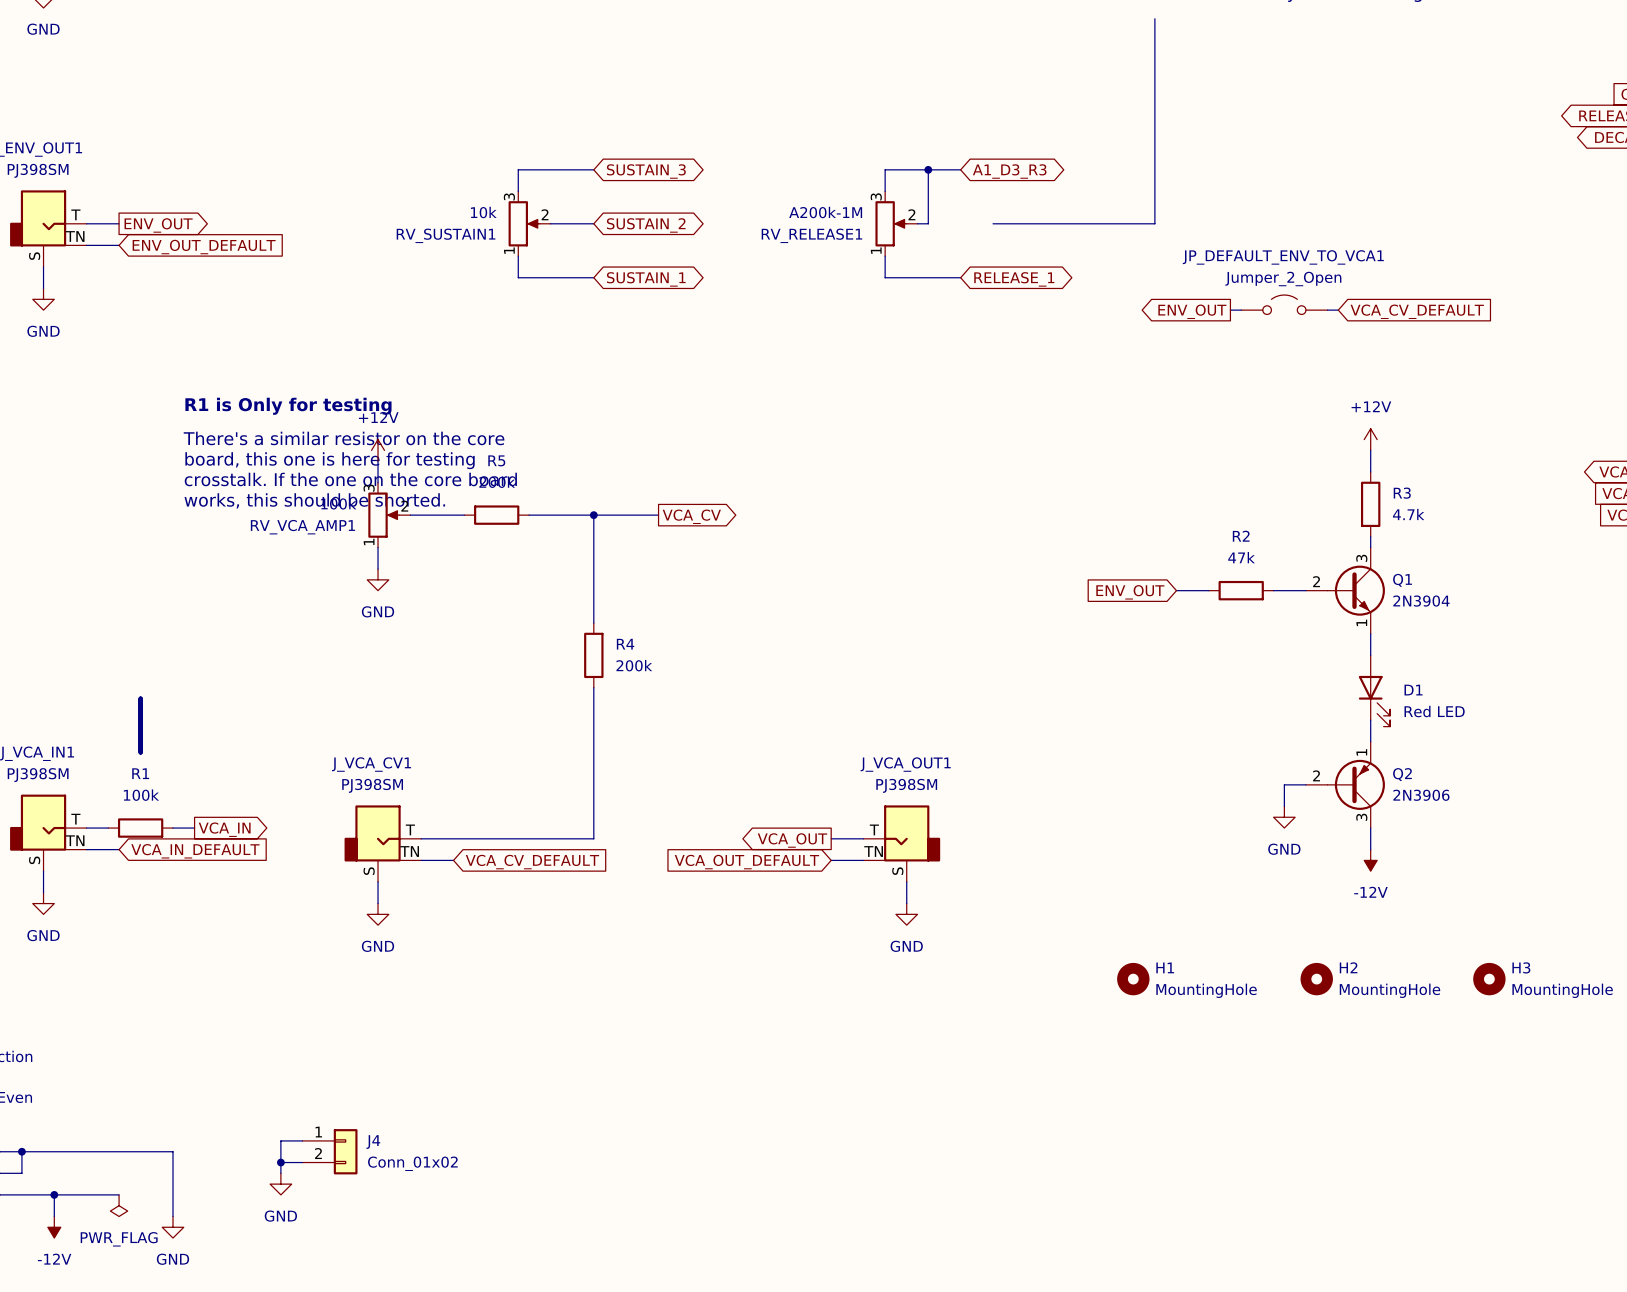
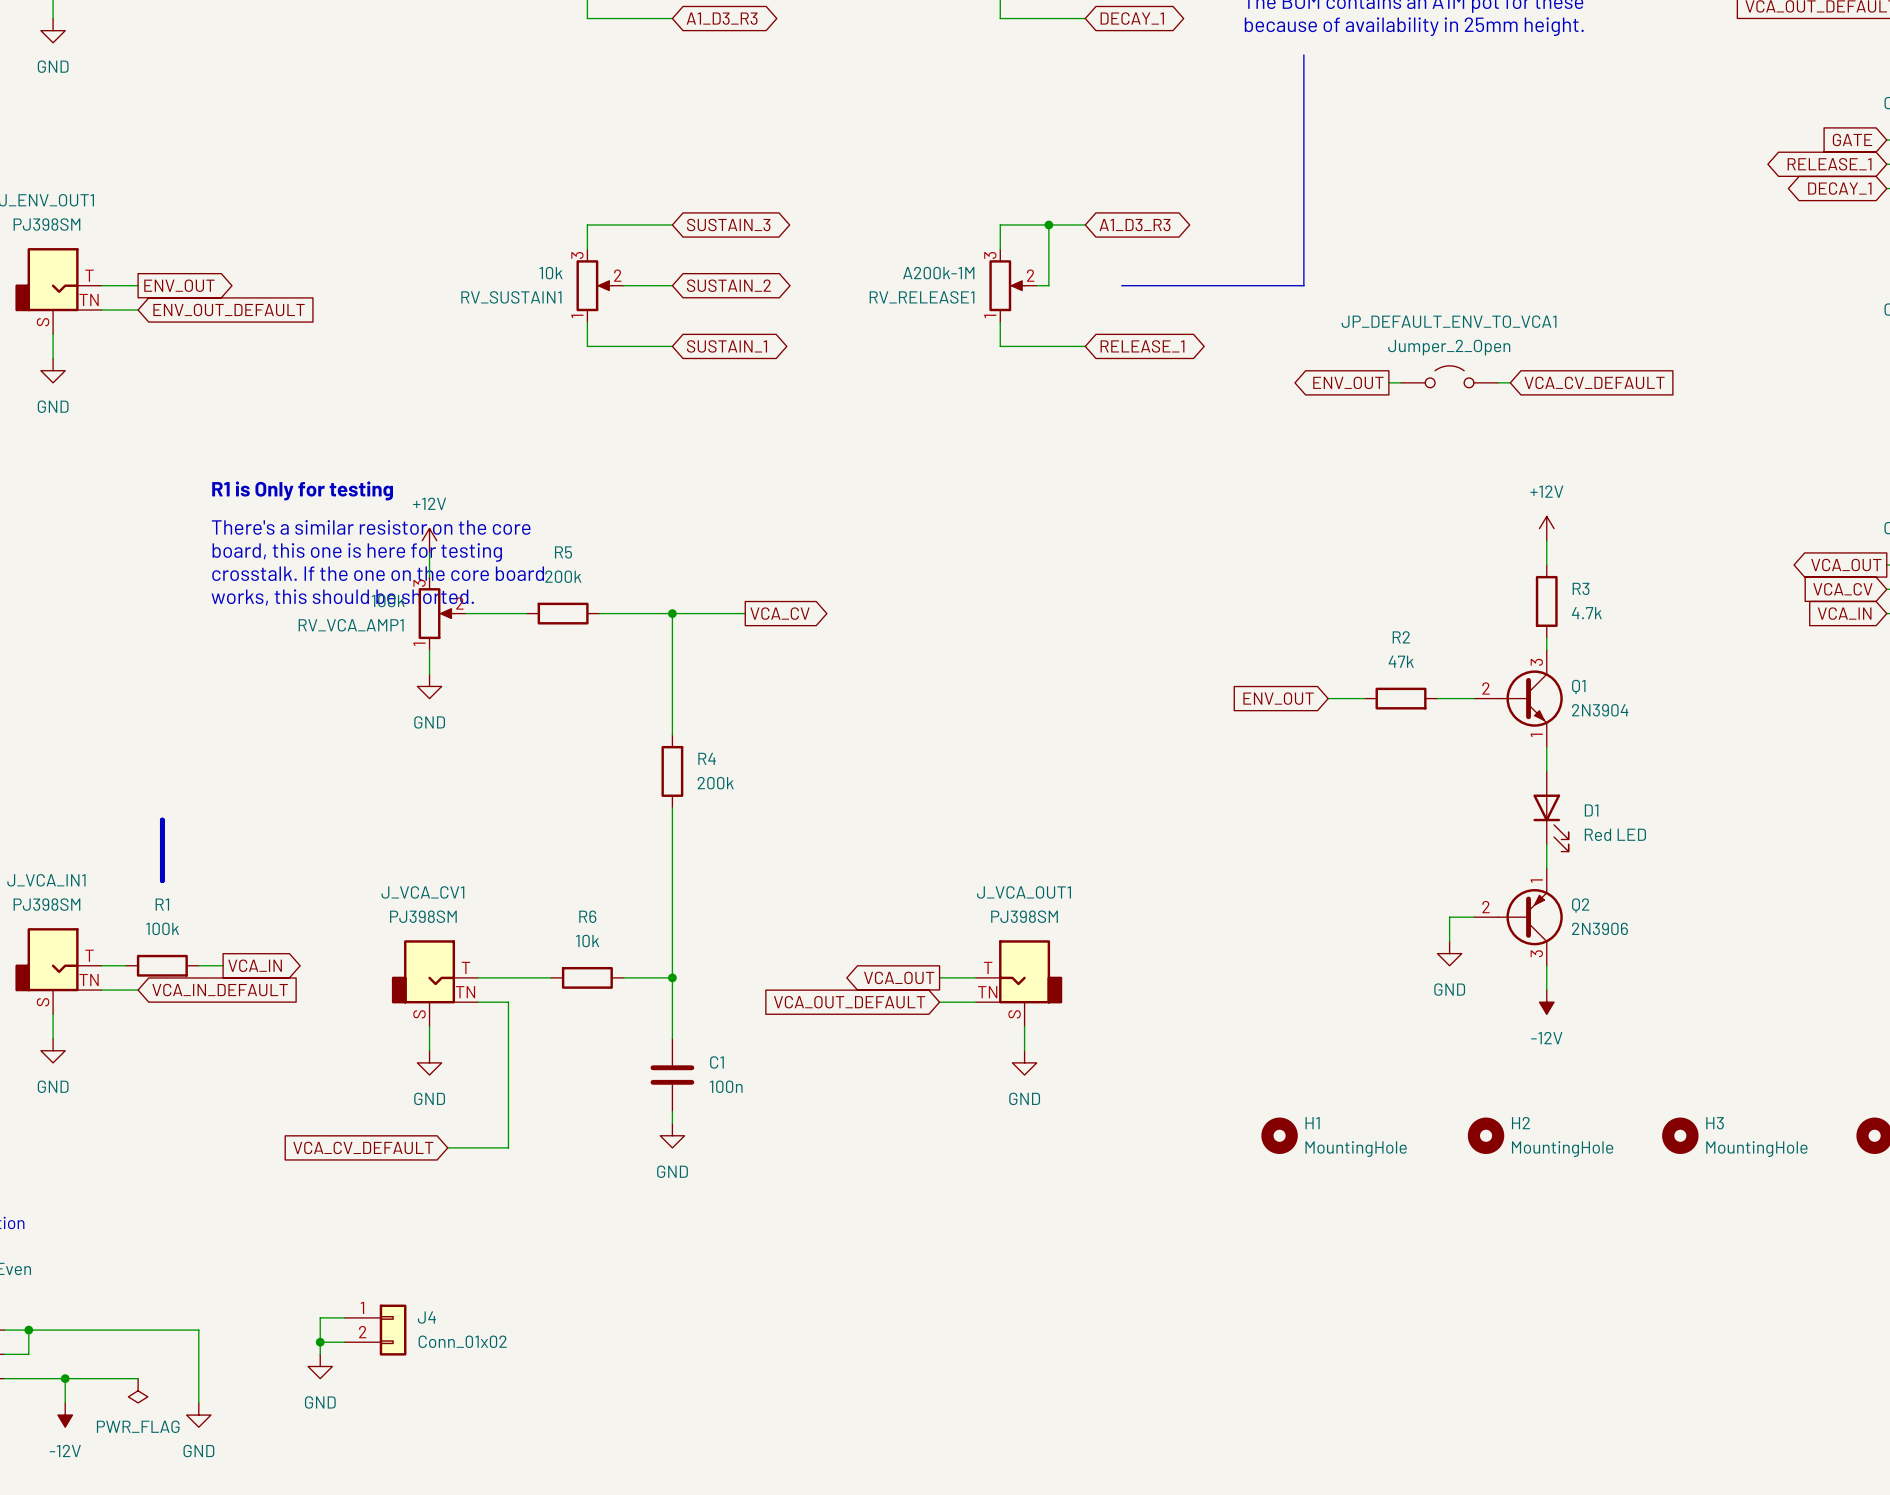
wire: (485, 838) (550, 838) -> none
R6: none -> 10k (587, 977)
wire: none -> (672, 977) (672, 1038)
junction: none -> (672, 977)
wire: (448, 860) (453, 860) -> (508, 1002) (508, 1147) (447, 1147)
global label rotation: 0° (532, 862) -> 180° (363, 1147)
global label position: VCA_CV_DEFAULT (532, 862) -> VCA_CV_DEFAULT (363, 1147)
C1: none -> 100n (672, 1075)
wire: none -> (672, 1111) (672, 1123)
power symbol: none -> GND (672, 1135)

